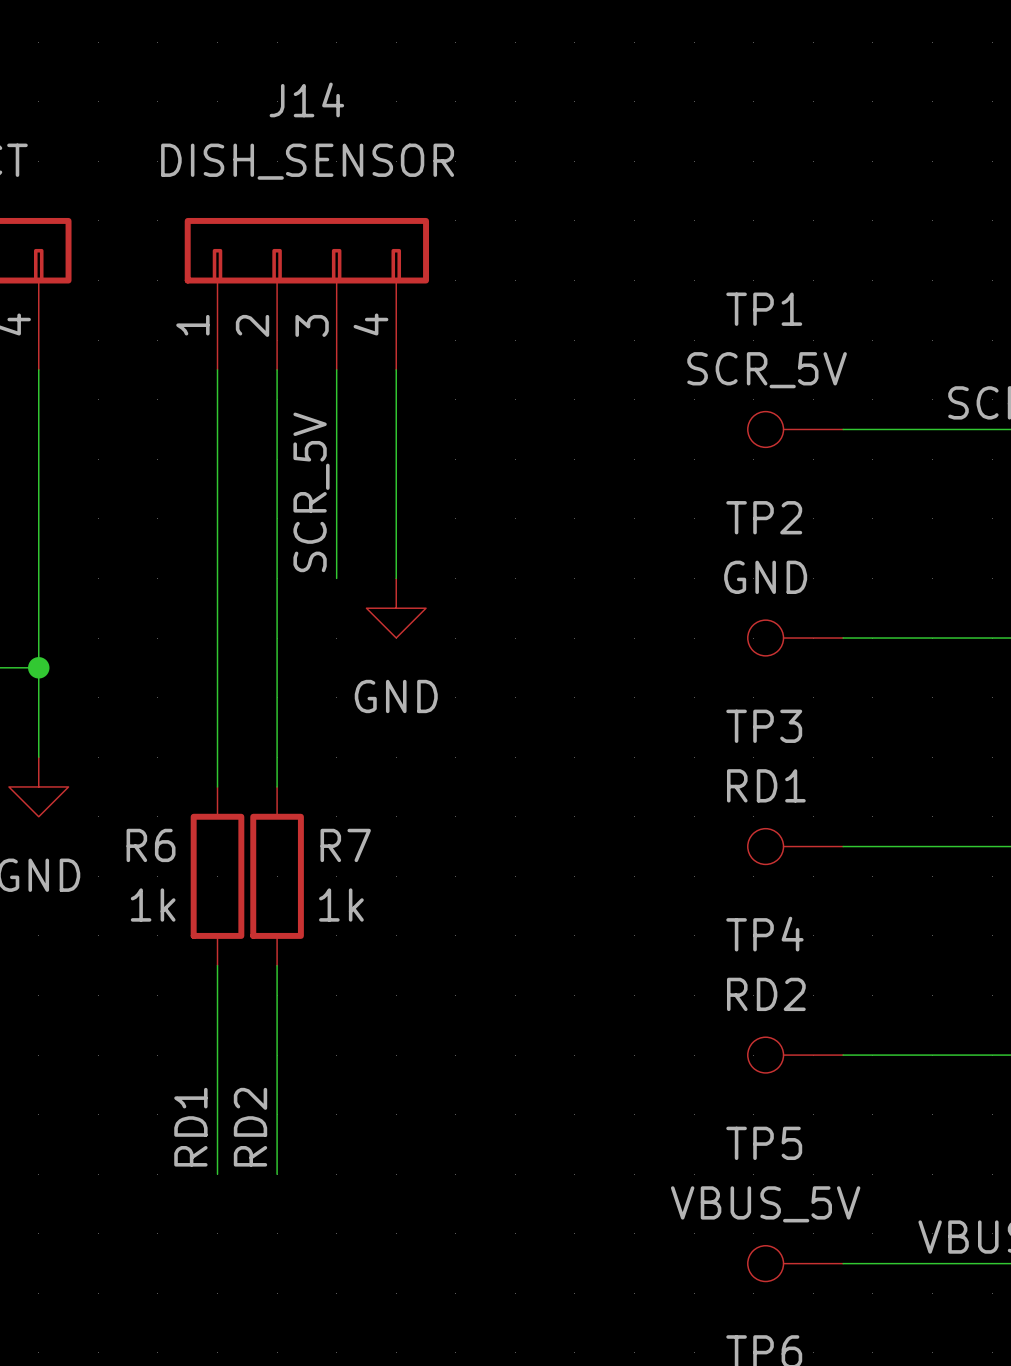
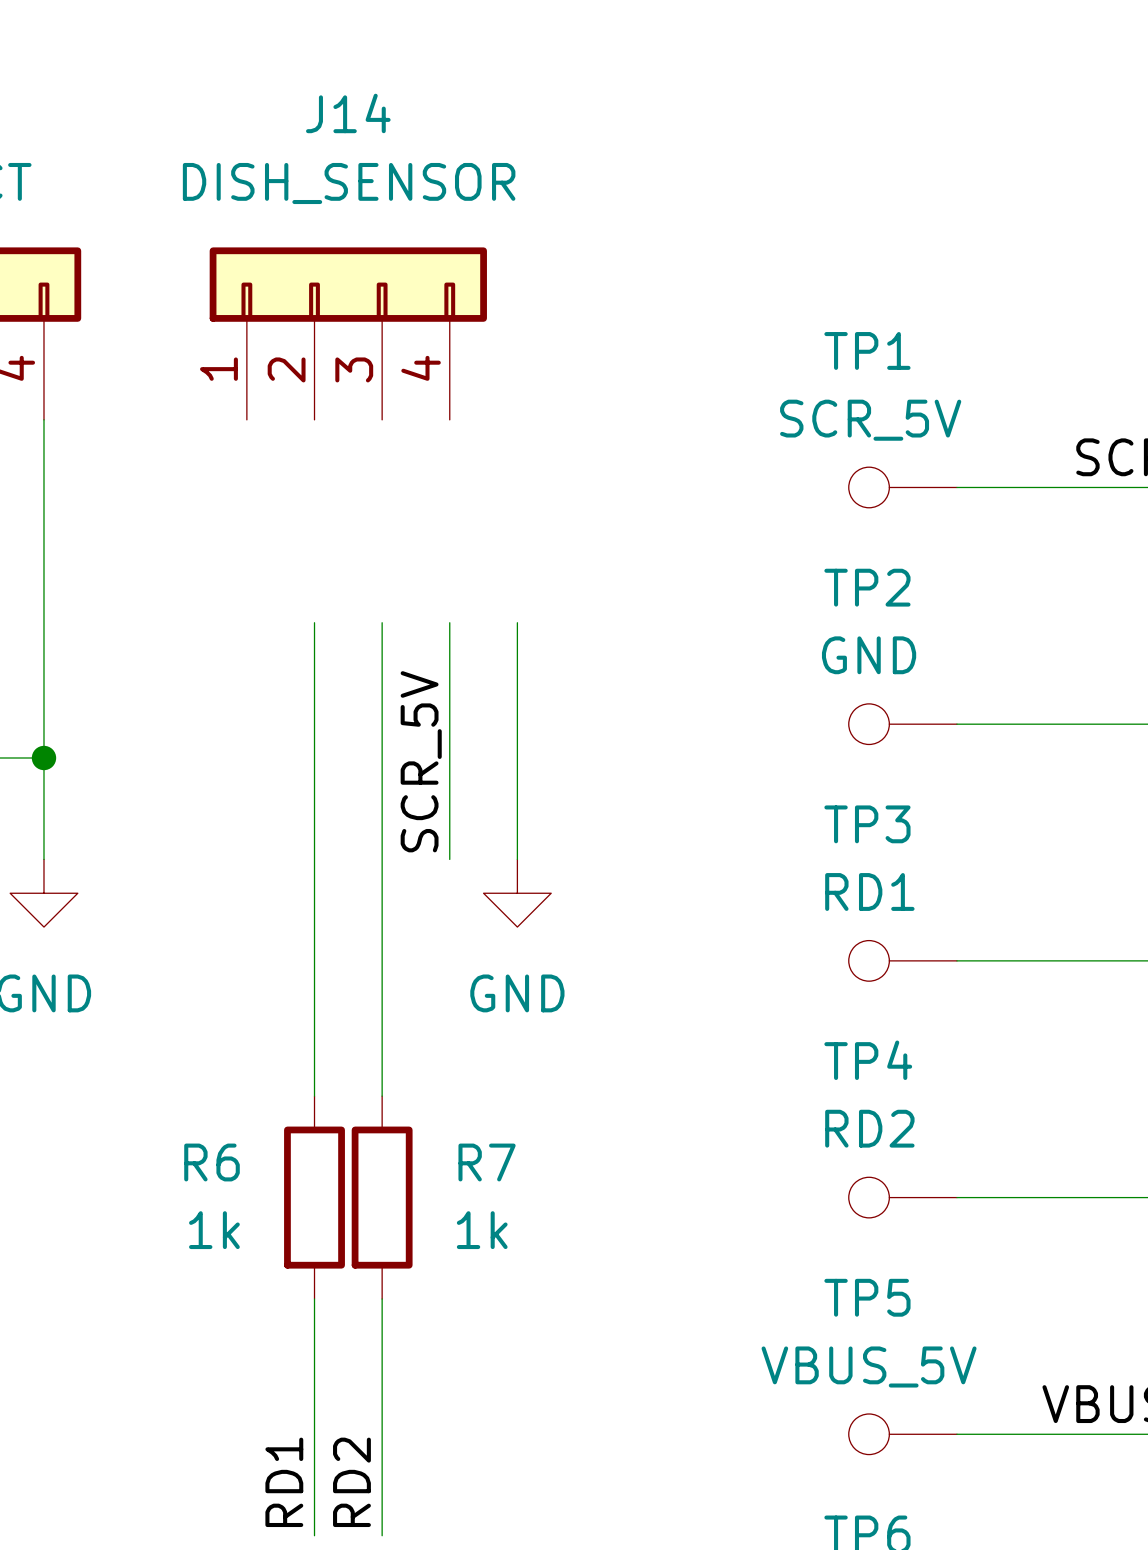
wire: (217, 369) (217, 786) -> none
wire: (277, 369) (277, 548) -> none
wire: (336, 369) (336, 548) -> none
wire: (396, 369) (396, 548) -> (449, 656) (449, 859)
label position: SCR_5V (311, 492) -> SCR_5V (421, 761)
wire: none -> (517, 622) (517, 859)
wire: none -> (382, 656) (382, 1096)
power symbol position: GND (396, 608) -> GND (517, 893)
R6 name position: R6 (151, 845) -> R6 (212, 1162)
R7 name position: R7 (345, 845) -> R7 (487, 1162)
R6 position: (217, 876) -> (314, 1197)
R7 position: (277, 876) -> (382, 1197)
R6 value position: 1k (153, 905) -> 1k (214, 1230)
R7 value position: 1k (341, 905) -> 1k (482, 1230)
wire: (217, 965) (217, 1174) -> (382, 1299) (382, 1535)
wire: (277, 965) (277, 1144) -> (314, 1096) (314, 893)
label position: RD1 (190, 1127) -> RD1 (284, 1482)
label position: RD2 (250, 1127) -> RD2 (351, 1482)
wire: none -> (314, 1332) (314, 1535)

